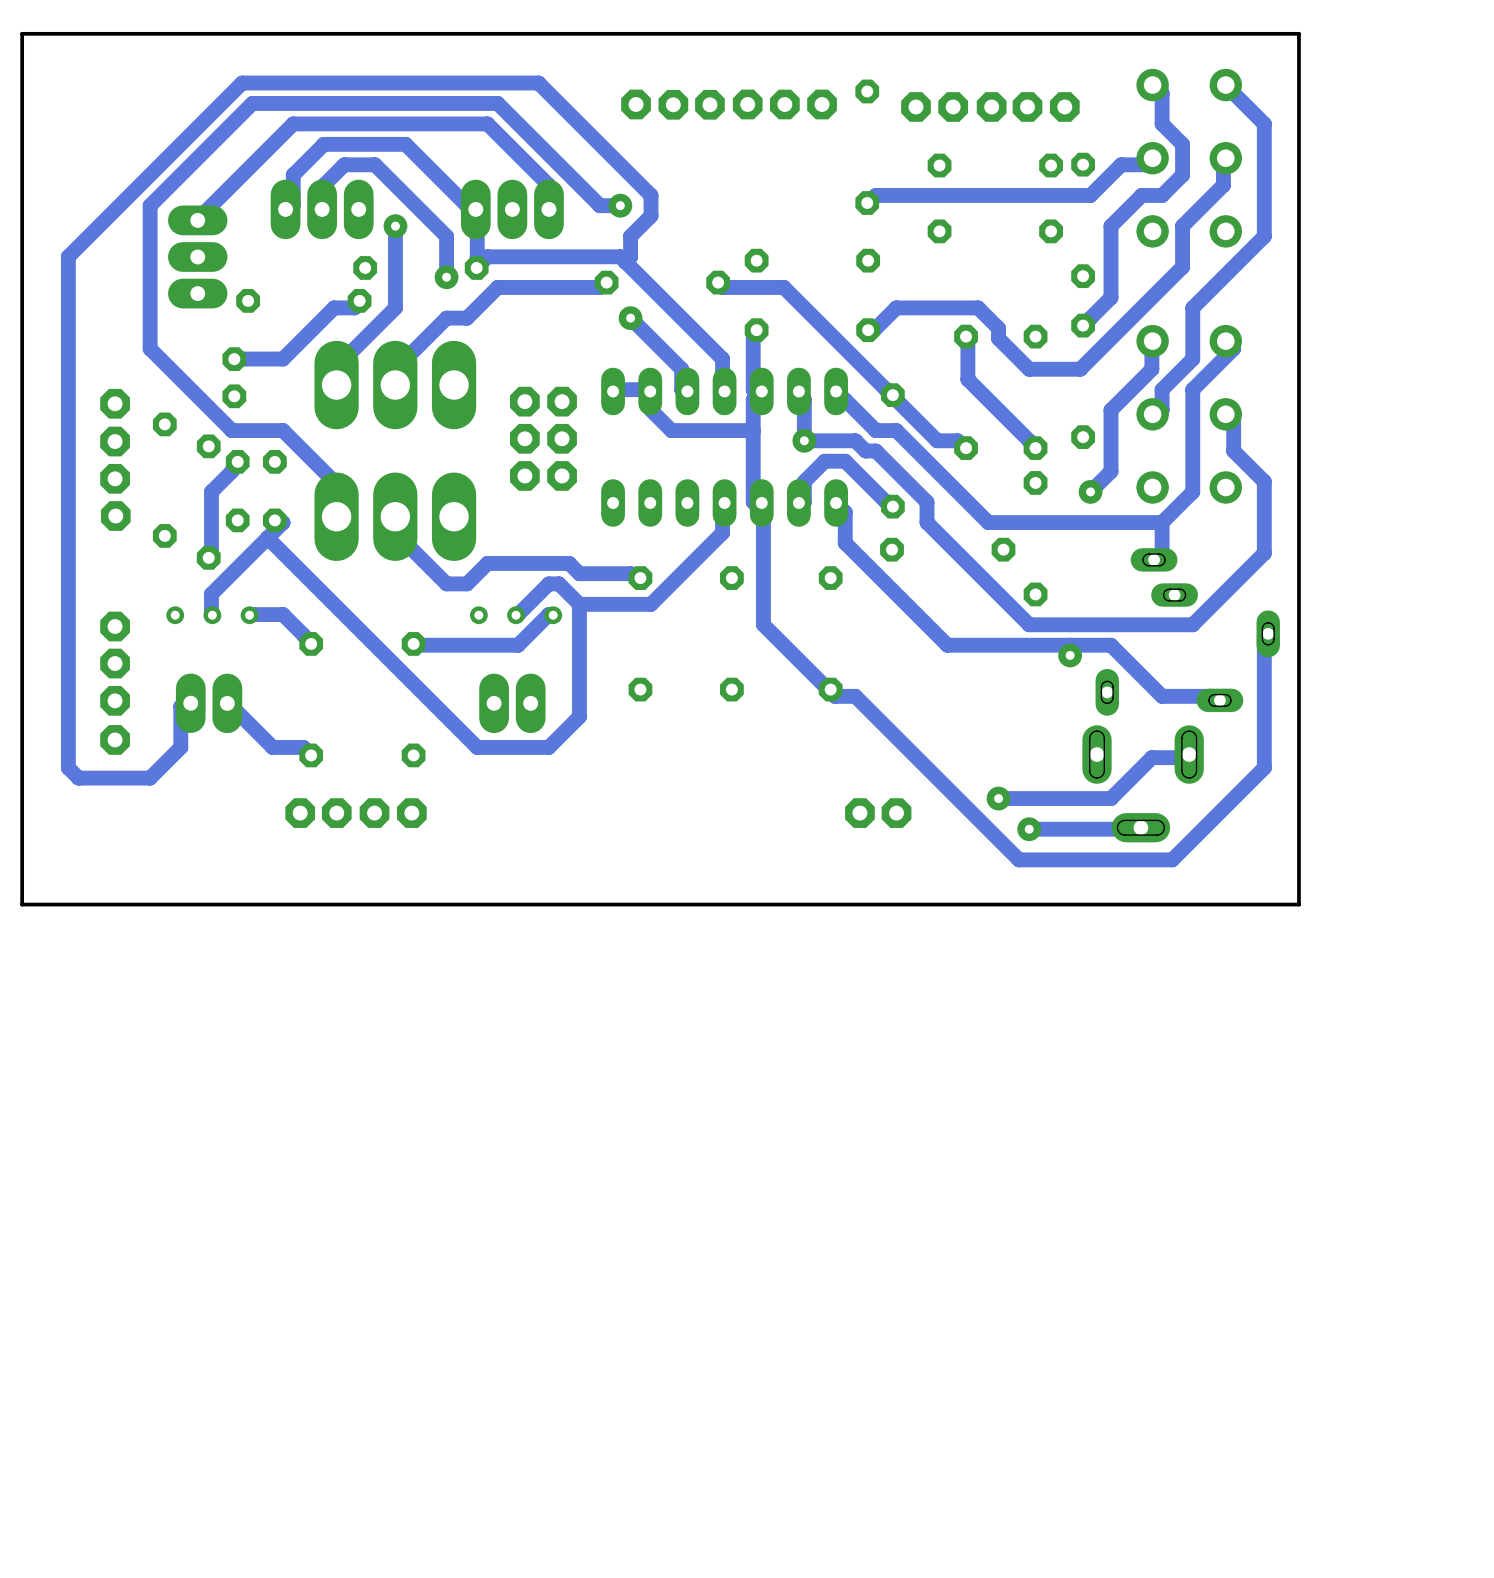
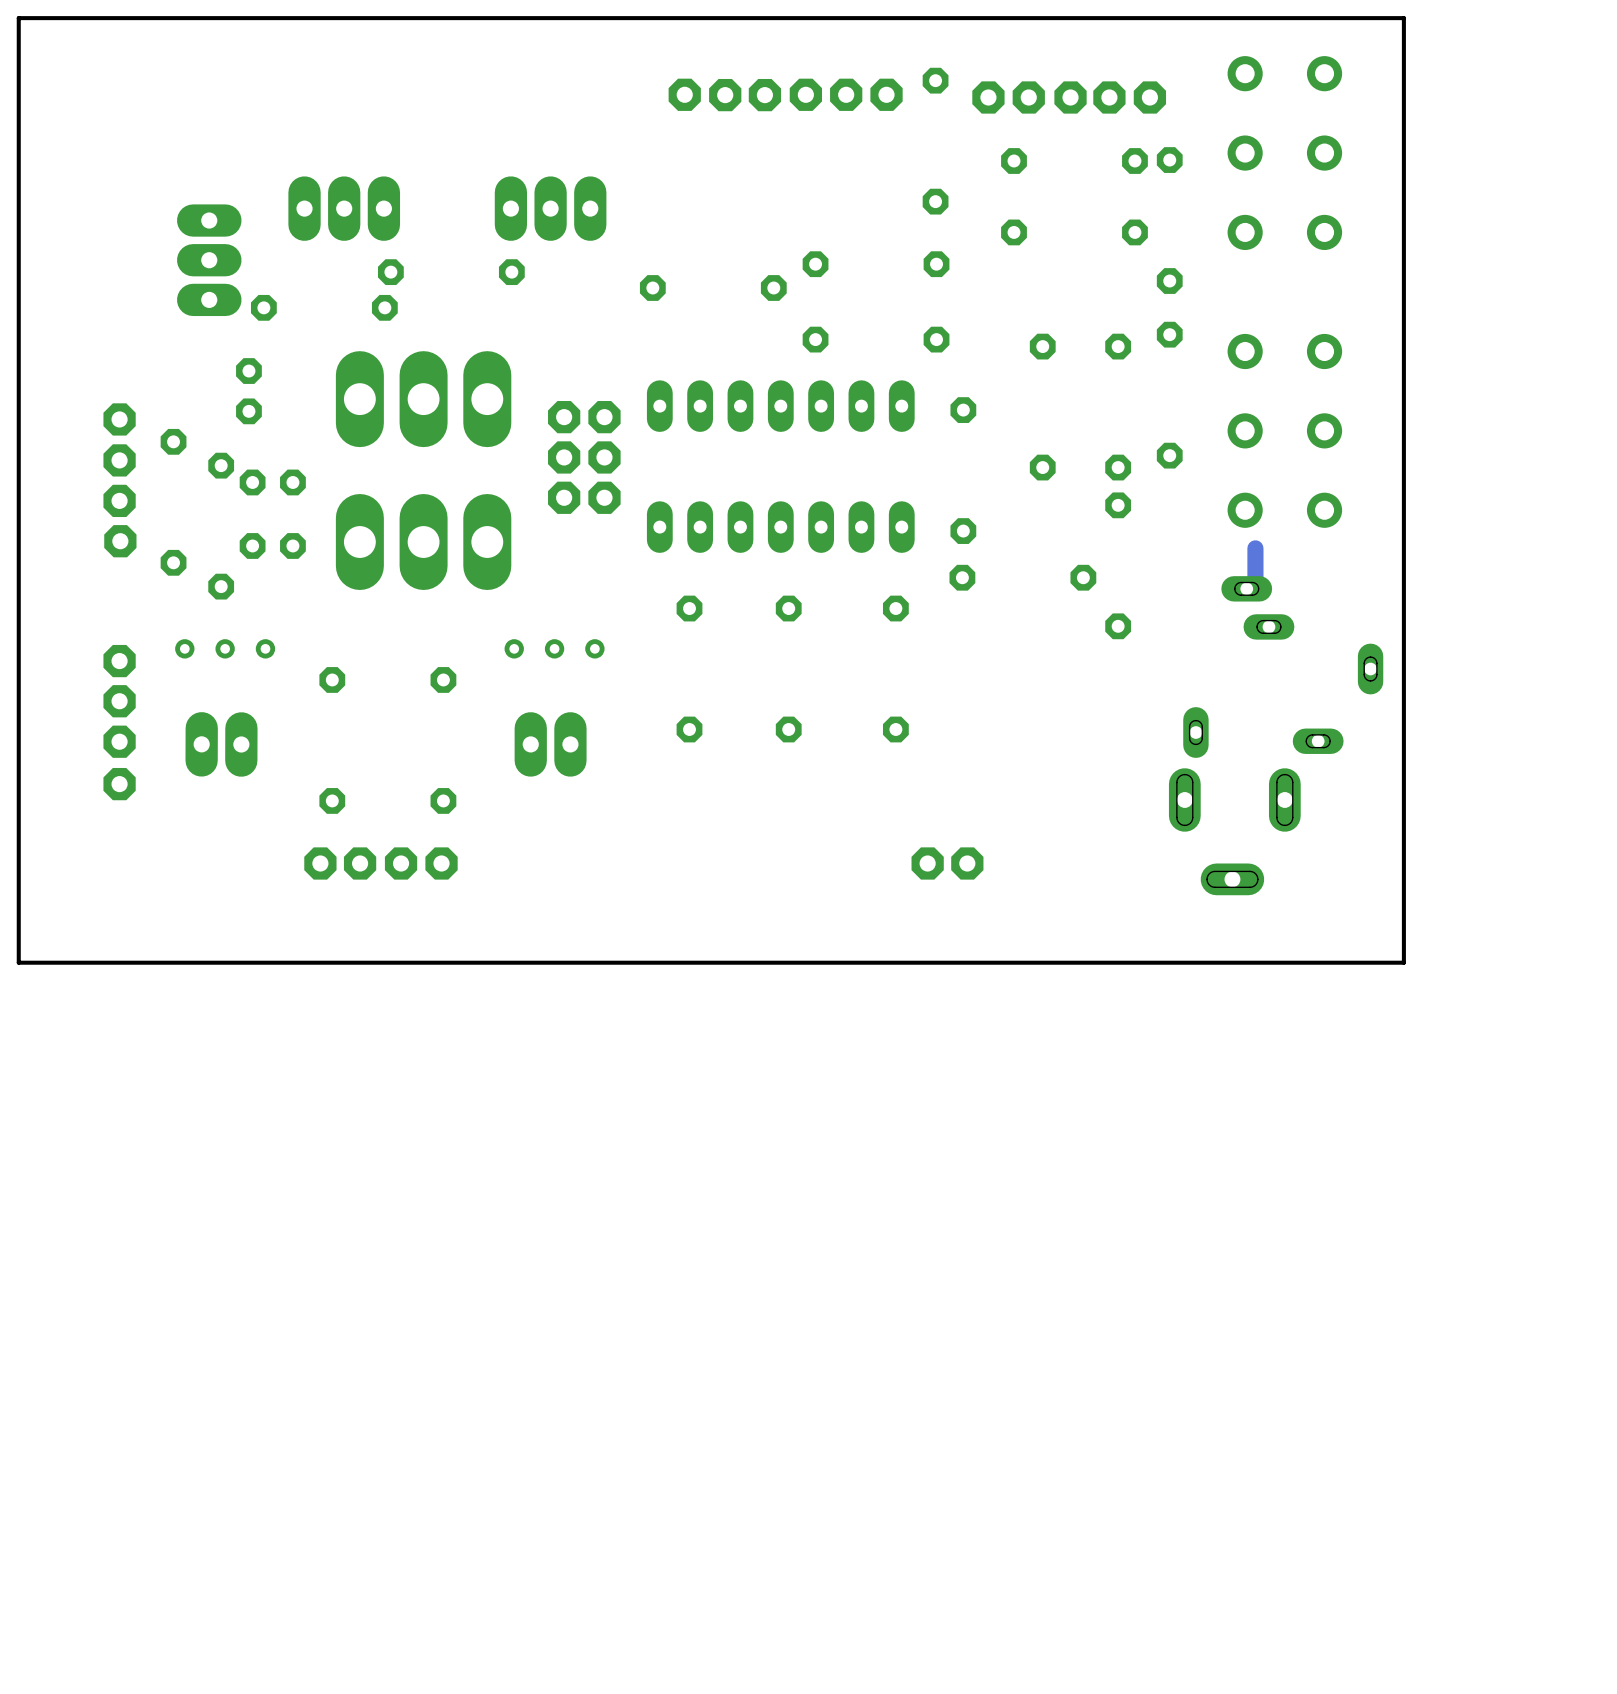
track: (1152, 85) (1162, 93) (1162, 123) (1182, 144) (1182, 175) (1162, 195) (1141, 195) (1111, 226) (1111, 297) (1083, 325) -> none
track: (1225, 85) (1264, 123) (1264, 236) (1192, 307) (1192, 359) (1162, 389) (1162, 410) (1152, 414) -> none
track: (1152, 158) (1151, 164) (1121, 164) (1090, 195) (875, 195) (867, 202) -> none
track: (1225, 158) (1223, 164) (1223, 185) (1182, 226) (1182, 267) (1080, 369) (1029, 369) (998, 338) (998, 328) (978, 307) (896, 307) (875, 328) (868, 330) -> none
track: (620, 205) (599, 205) (497, 103) (252, 103) (150, 205) (150, 348) (231, 430) (283, 430) (334, 481) (334, 512) (336, 516) -> none
via: (620, 205) -> none
track: (285, 209) (293, 205) (293, 175) (323, 144) (405, 144) (467, 205) (475, 209) (476, 267) (487, 256) (620, 256) (722, 359) (722, 389) (724, 391) -> none
track: (322, 209) (323, 185) (344, 164) (375, 164) (446, 236) (446, 277) -> none
track: (548, 209) (548, 185) (487, 123) (293, 123) (197, 220) -> none
track: (395, 226) (395, 307) (344, 359) (344, 379) (336, 385) -> none
via: (395, 226) -> none
track: (625, 261) (630, 256) (630, 236) (651, 215) (651, 195) (538, 83) (242, 83) (68, 256) (68, 767) (78, 778) (150, 778) (180, 747) (180, 706) (190, 703) -> none
via: (446, 277) -> none
track: (606, 282) (599, 287) (497, 287) (467, 318) (446, 318) (385, 379) (395, 385) -> none
track: (718, 282) (722, 287) (783, 287) (937, 440) (957, 440) (966, 448) -> none
track: (359, 300) (354, 307) (334, 307) (283, 359) (234, 359) -> none
track: (630, 318) (681, 369) (681, 389) (687, 391) -> none
via: (630, 318) -> none
track: (756, 330) (753, 338) (753, 389) (761, 391) (753, 399) (753, 502) (761, 502) (763, 512) (763, 624) (824, 686) (830, 689) (835, 696) (855, 696) (1019, 859) (1172, 859) (1264, 767) (1264, 635) (1268, 633) -> none
track: (966, 336) (967, 338) (967, 379) (1035, 448) -> none
track: (1152, 341) (1151, 369) (1111, 410) (1111, 471) (1090, 491) -> none
track: (1225, 341) (1233, 348) (1192, 389) (1192, 491) (1162, 522) (988, 522) (896, 430) (875, 430) (836, 391) -> none
track: (613, 391) (620, 389) (650, 391) (651, 410) (671, 430) (753, 430) -> none
track: (798, 391) (804, 399) (804, 440) (855, 440) (865, 451) (875, 451) (927, 502) (927, 522) (1029, 624) (1192, 624) (1264, 553) (1264, 481) (1233, 451) (1233, 420) (1225, 414) -> none
via: (804, 440) -> none
track: (237, 461) (231, 471) (211, 491) (211, 553) (208, 557) -> none
via: (1090, 491) -> none
track: (724, 502) (722, 532) (651, 604) (579, 604) -> none
track: (798, 502) (804, 502) (804, 481) (824, 461) (845, 461) (892, 506) -> none
track: (836, 502) (845, 512) (845, 543) (947, 645) (1111, 645) (1162, 696) (1213, 696) (1219, 700) -> none
track: (395, 516) (385, 522) (446, 583) (467, 583) (487, 563) (569, 563) (579, 573) (630, 573) (640, 578) -> none
track: (274, 520) (283, 522) (211, 594) (212, 615) -> none
track: (267, 537) (477, 747) (548, 747) (579, 716) (579, 604) -> none
track: (579, 604) (559, 583) (548, 583) (516, 615) -> none
track: (249, 615) (283, 614) (311, 643) -> none
track: (553, 615) (548, 614) (518, 645) (413, 643) -> none
via: (1070, 655) -> none
track: (227, 703) (272, 747) (303, 747) (311, 755) -> none
track: (1189, 754) (1182, 757) (1151, 757) (1111, 798) (998, 798) -> none
via: (998, 798) -> none
track: (1140, 827) (1029, 829) -> none
via: (1029, 829) -> none

